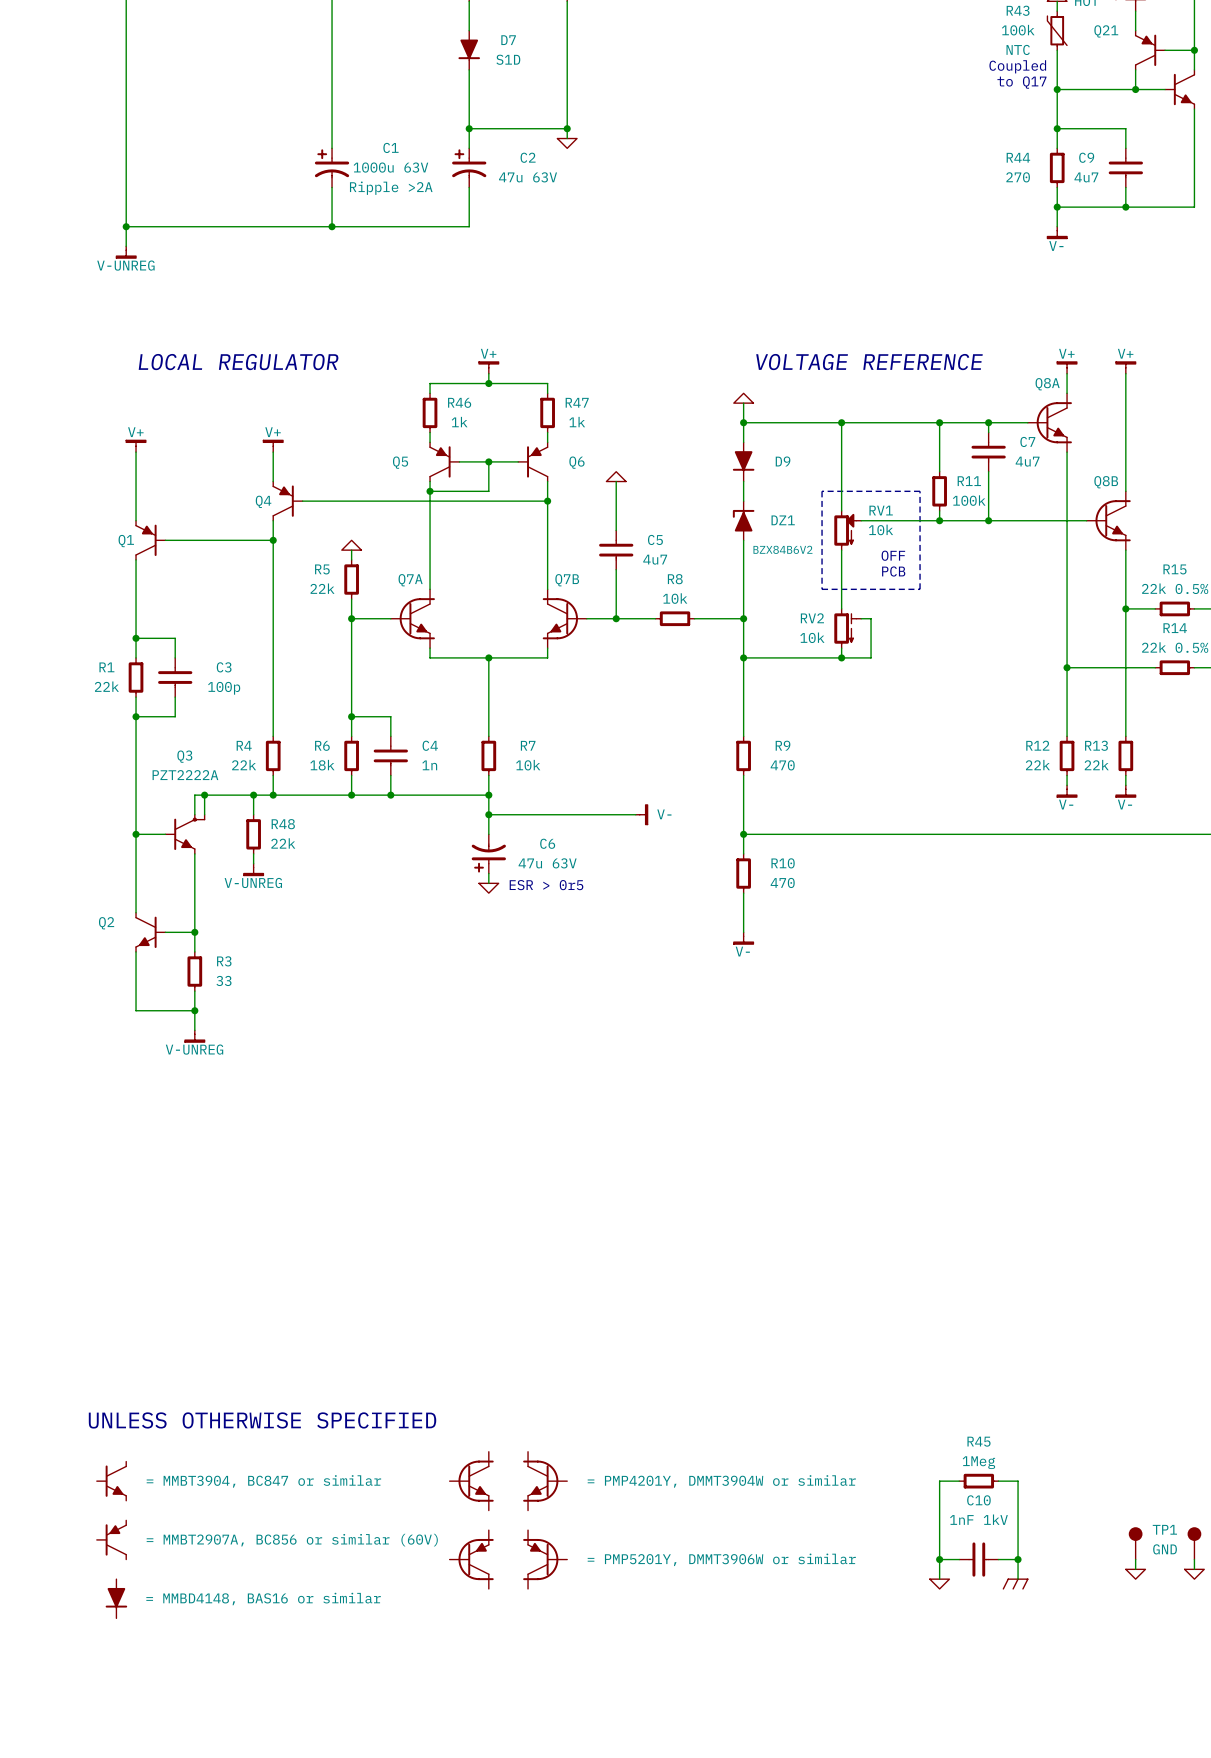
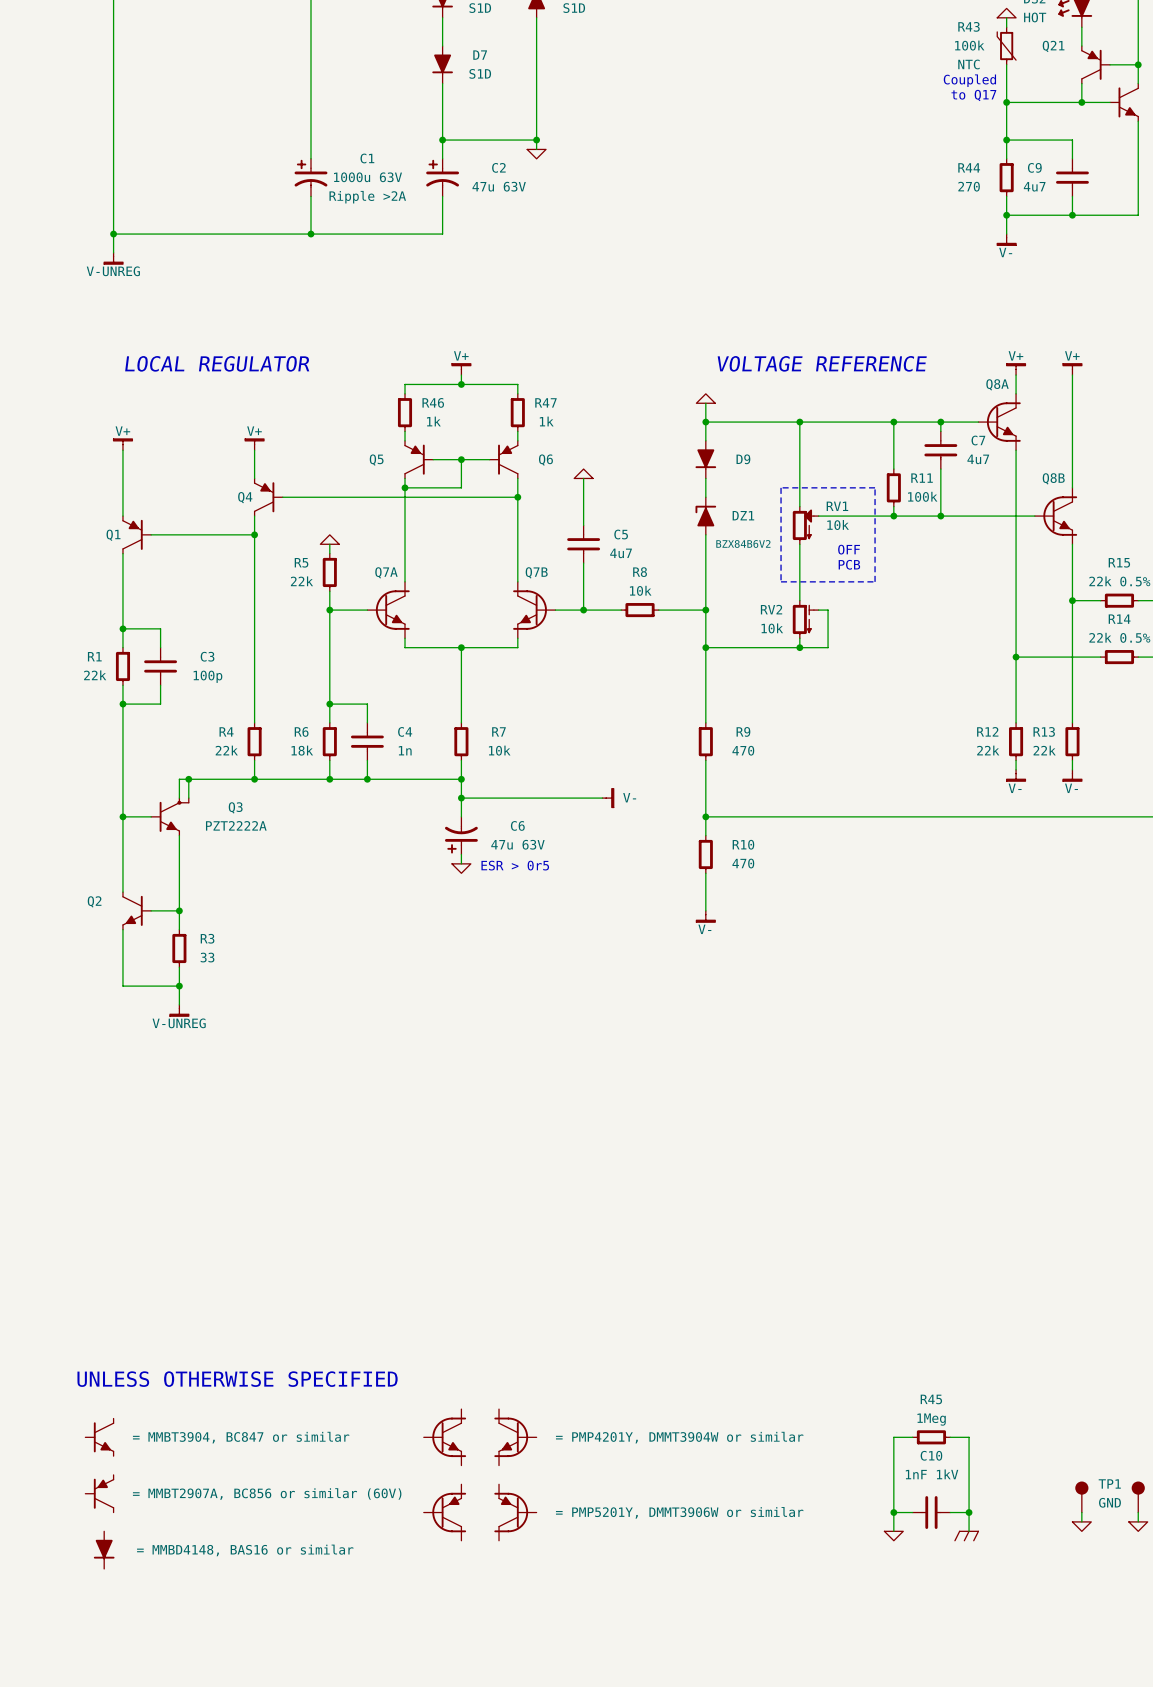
Q3 name position: Q3 (184, 756) -> Q3 (235, 807)
Q3 value position: PZT2222A (185, 775) -> PZT2222A (236, 825)
wire: (253, 795) (253, 814) -> none
junction: (253, 795) -> none
R48: 22k (253, 834) -> none
wire: (253, 853) (253, 863) -> none
power symbol: V-UNREG (253, 869) -> none

